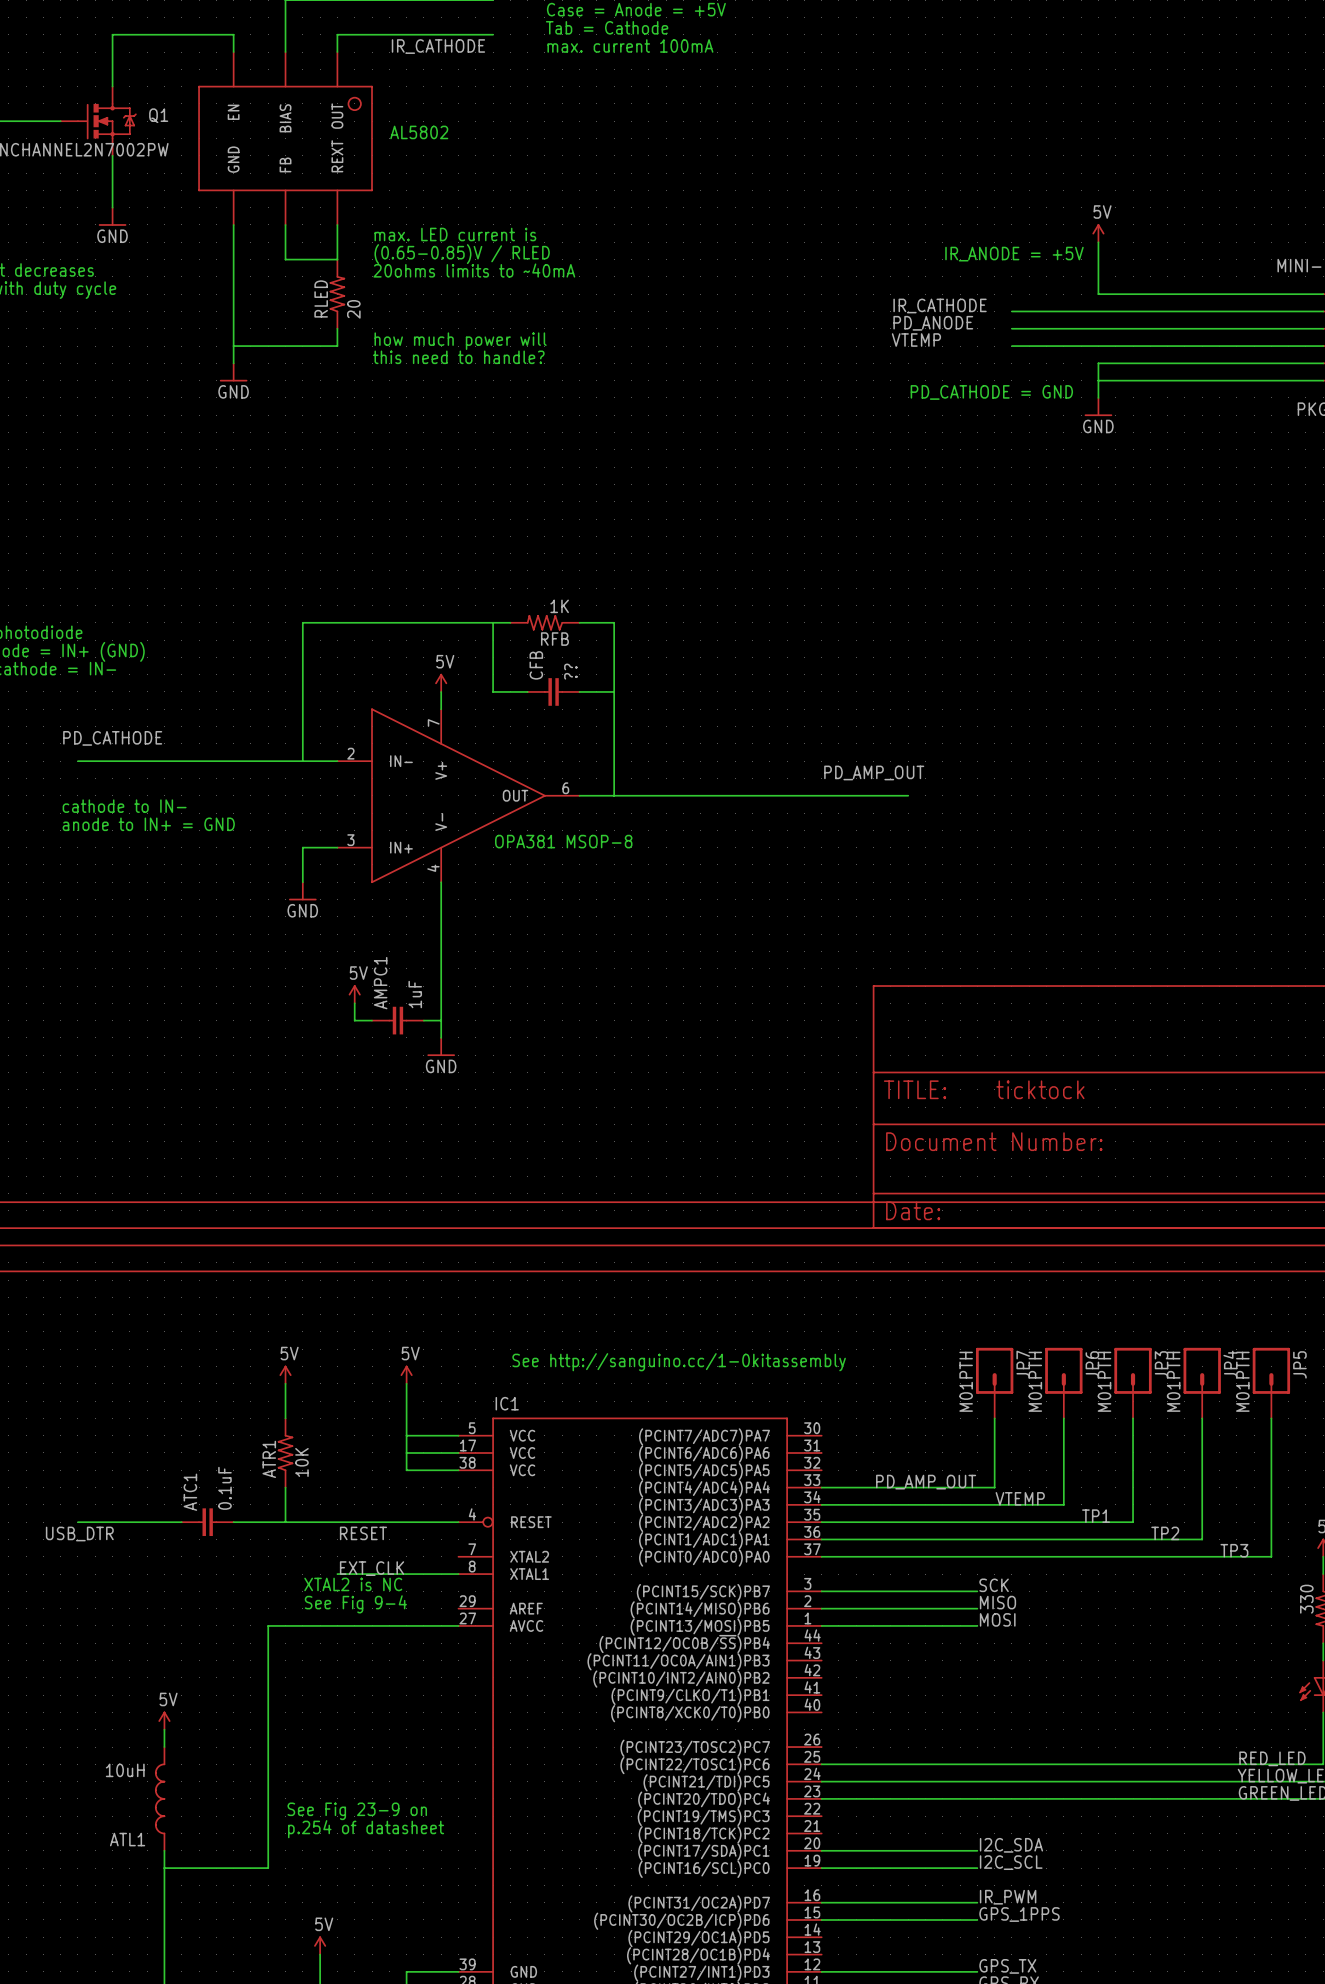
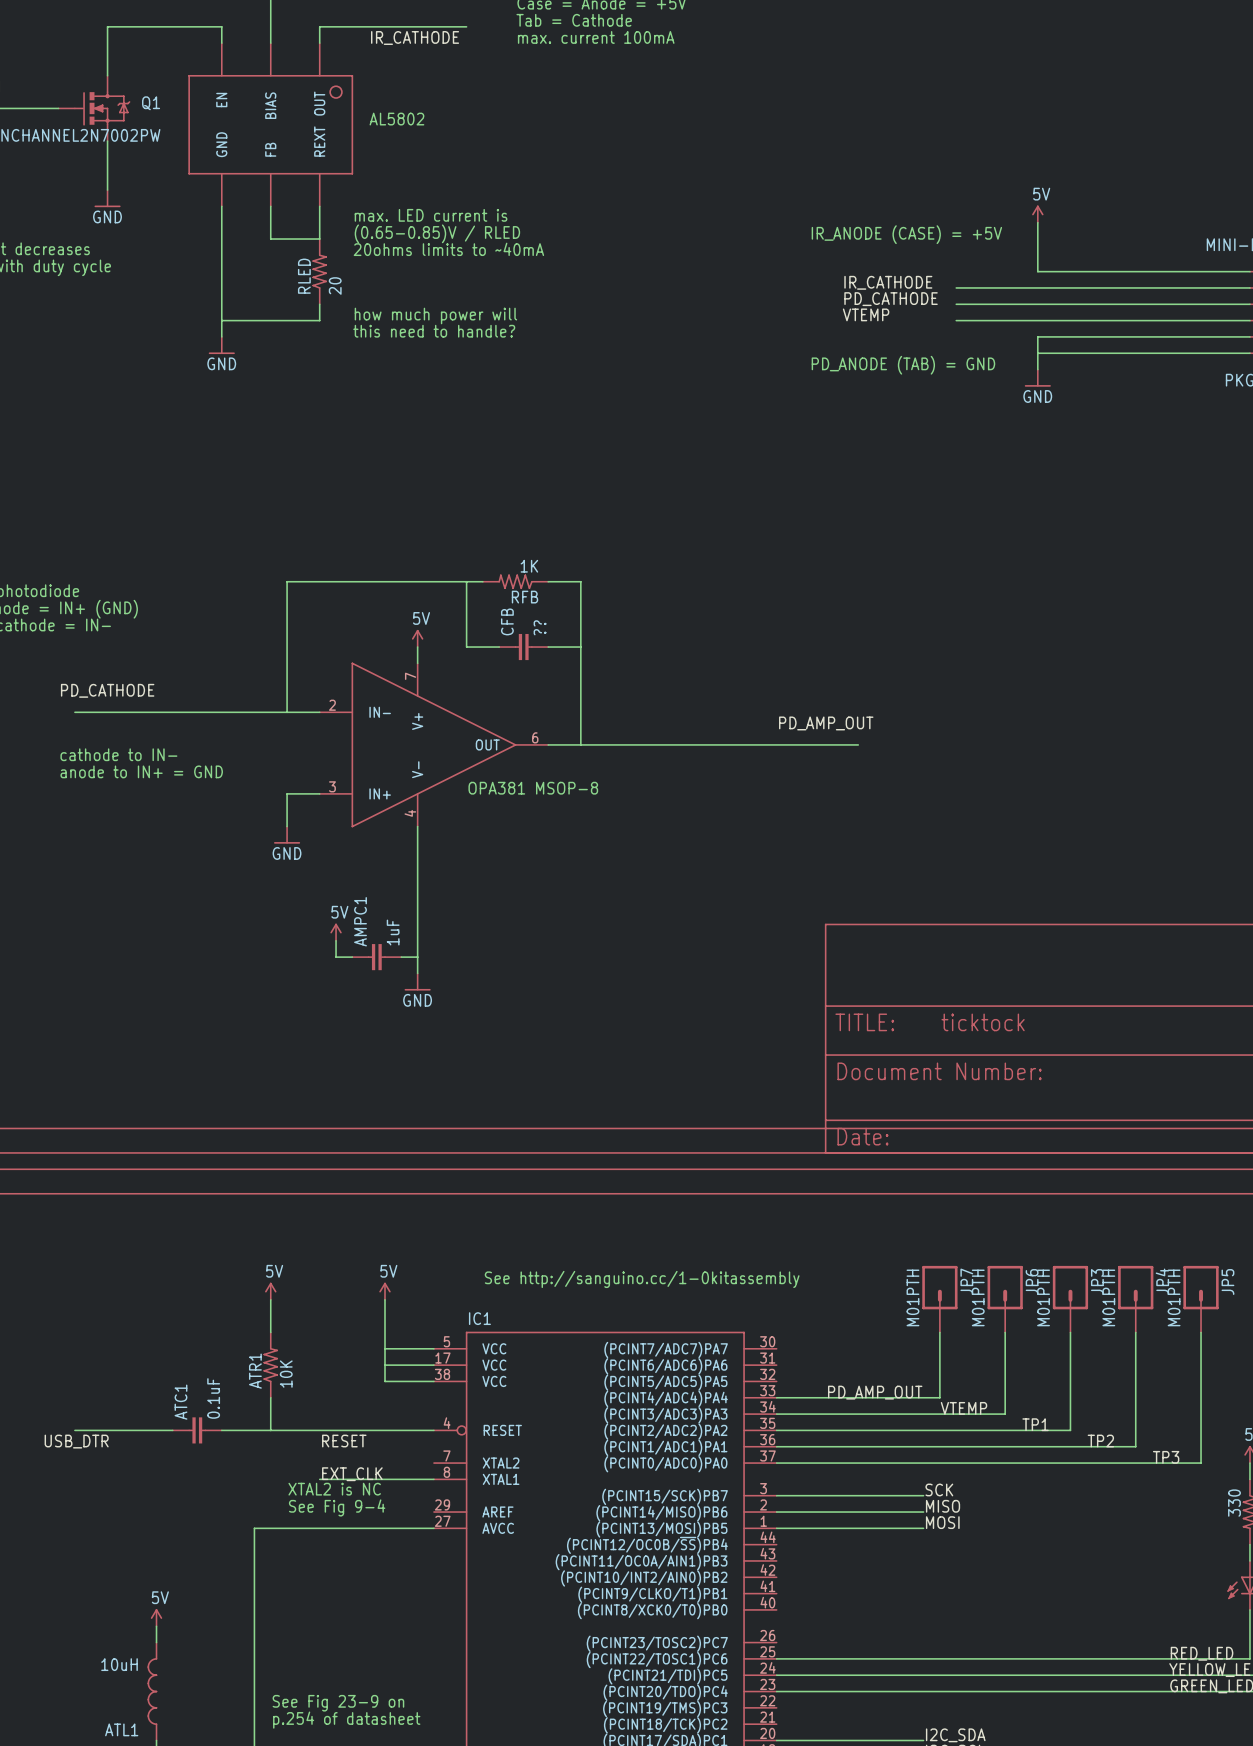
text: IR_ANODE = +5V (1014, 254) -> IR_ANODE (CASE) = +5V (906, 234)
label: PD_ANODE (933, 323) -> PD_CATHODE (891, 299)
text: PD_CATHODE = GND (991, 392) -> PD_ANODE (TAB) = GND (903, 365)

